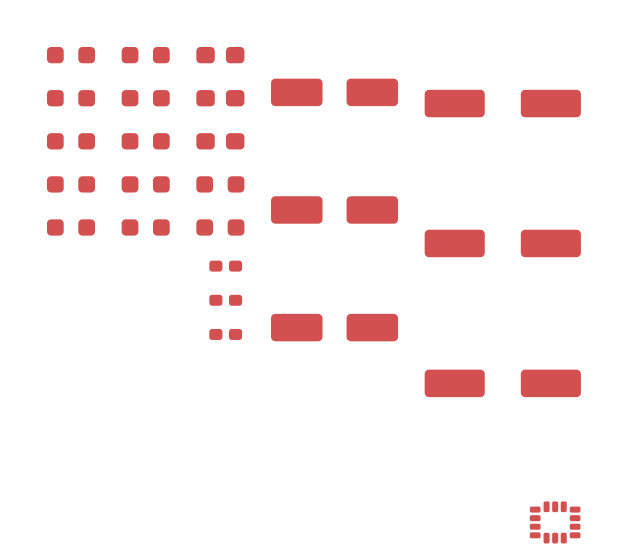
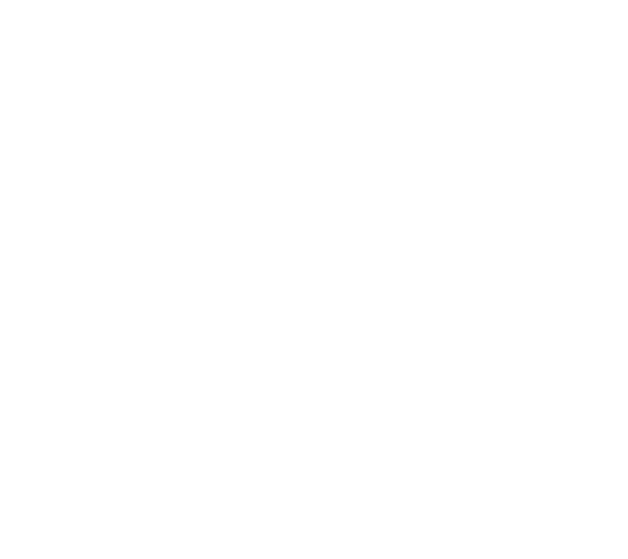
part: (71, 55) -> none
part: (145, 55) -> none
part: (220, 55) -> none
part: (334, 92) -> none
part: (71, 98) -> none
part: (145, 98) -> none
part: (220, 98) -> none
part: (502, 103) -> none
part: (71, 141) -> none
part: (145, 141) -> none
part: (220, 141) -> none
part: (71, 184) -> none
part: (145, 184) -> none
part: (220, 184) -> none
part: (334, 209) -> none
part: (71, 227) -> none
part: (145, 227) -> none
part: (220, 227) -> none
part: (502, 243) -> none
part: (225, 266) -> none
part: (225, 300) -> none
part: (334, 327) -> none
part: (225, 334) -> none
part: (502, 383) -> none
part: (555, 522) -> none

